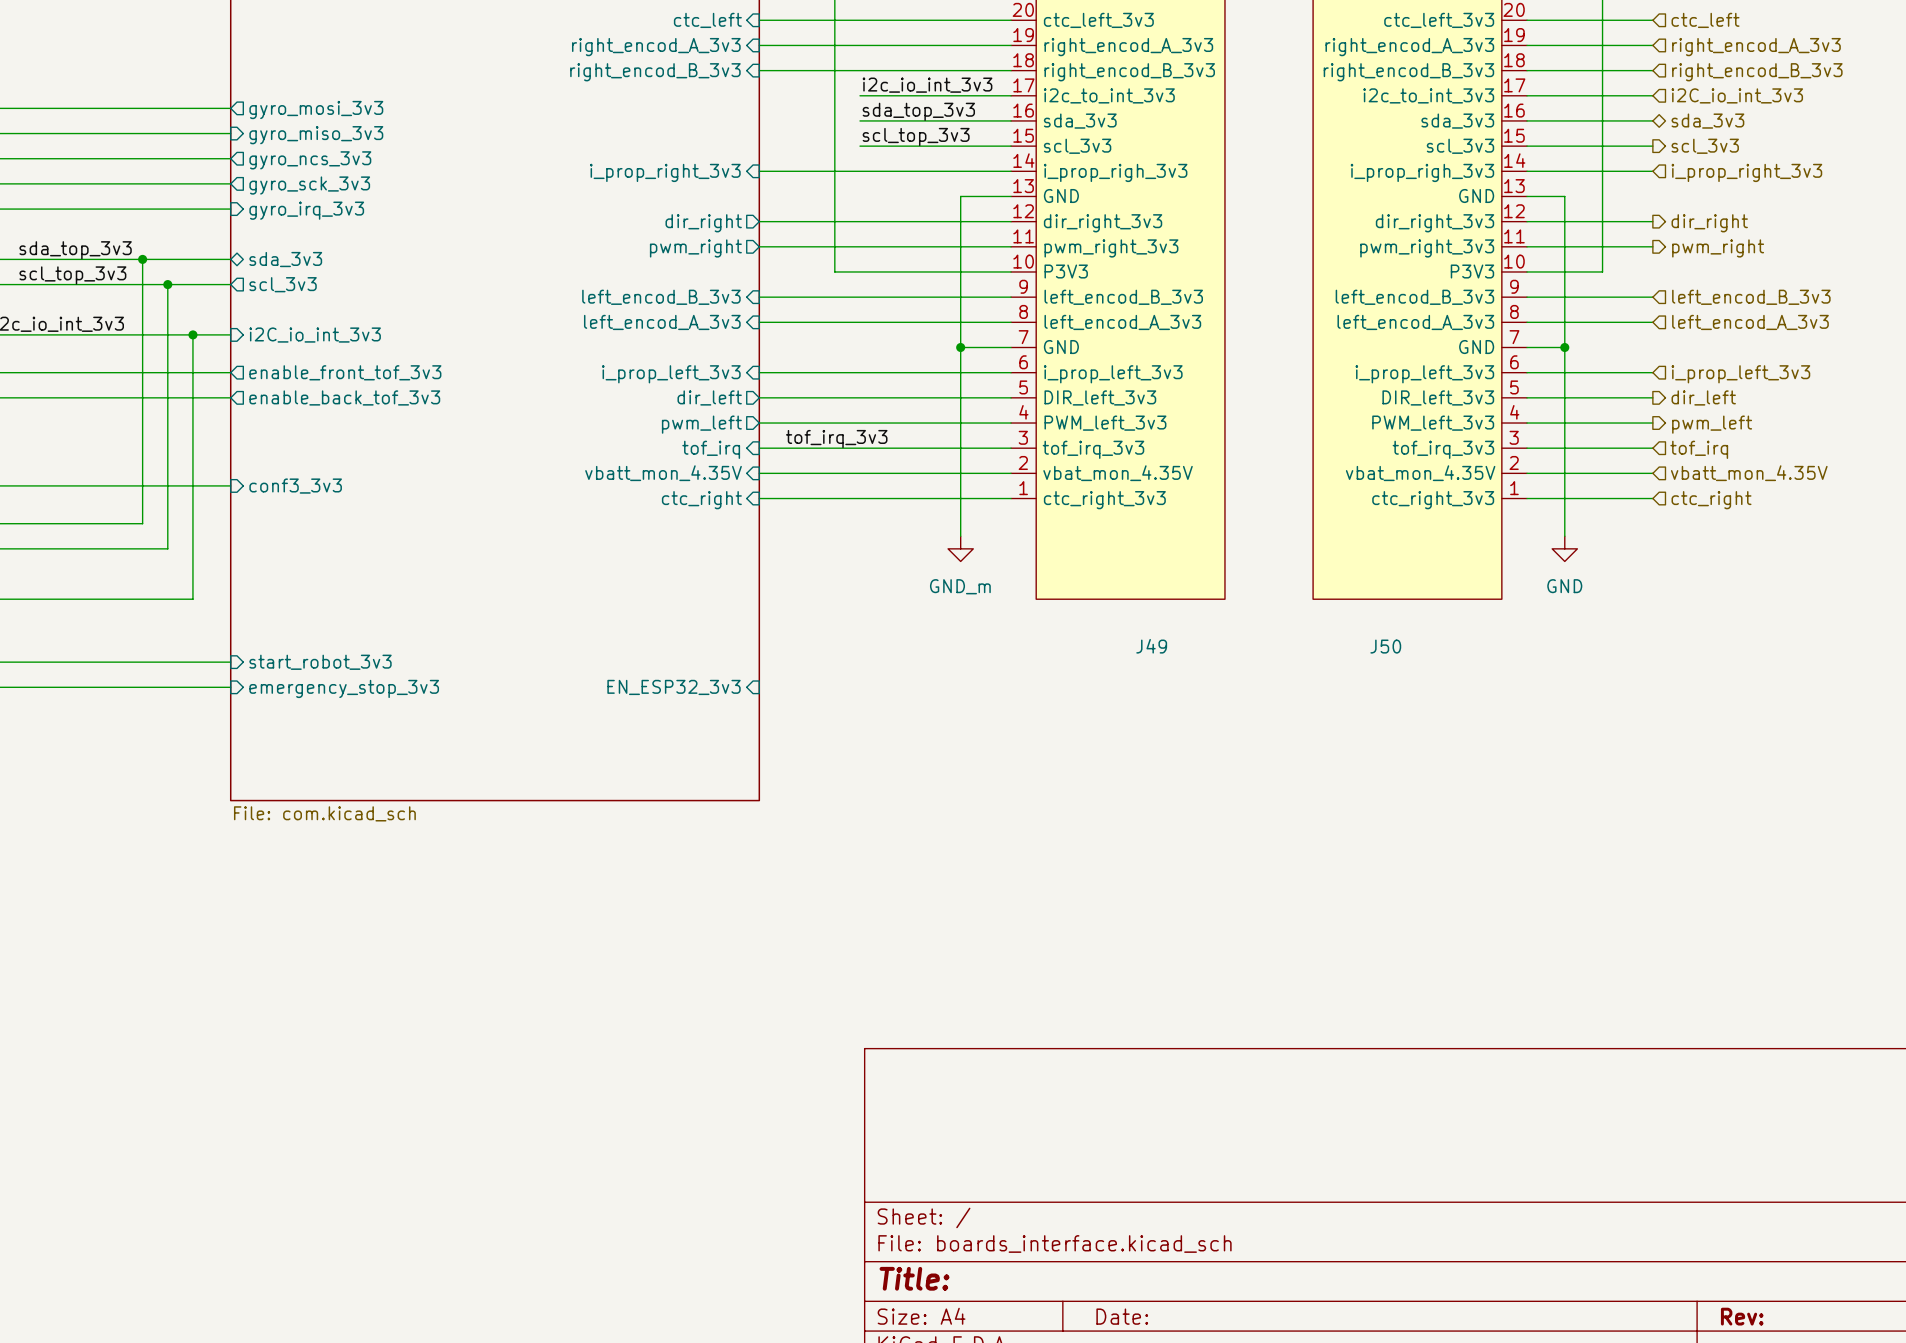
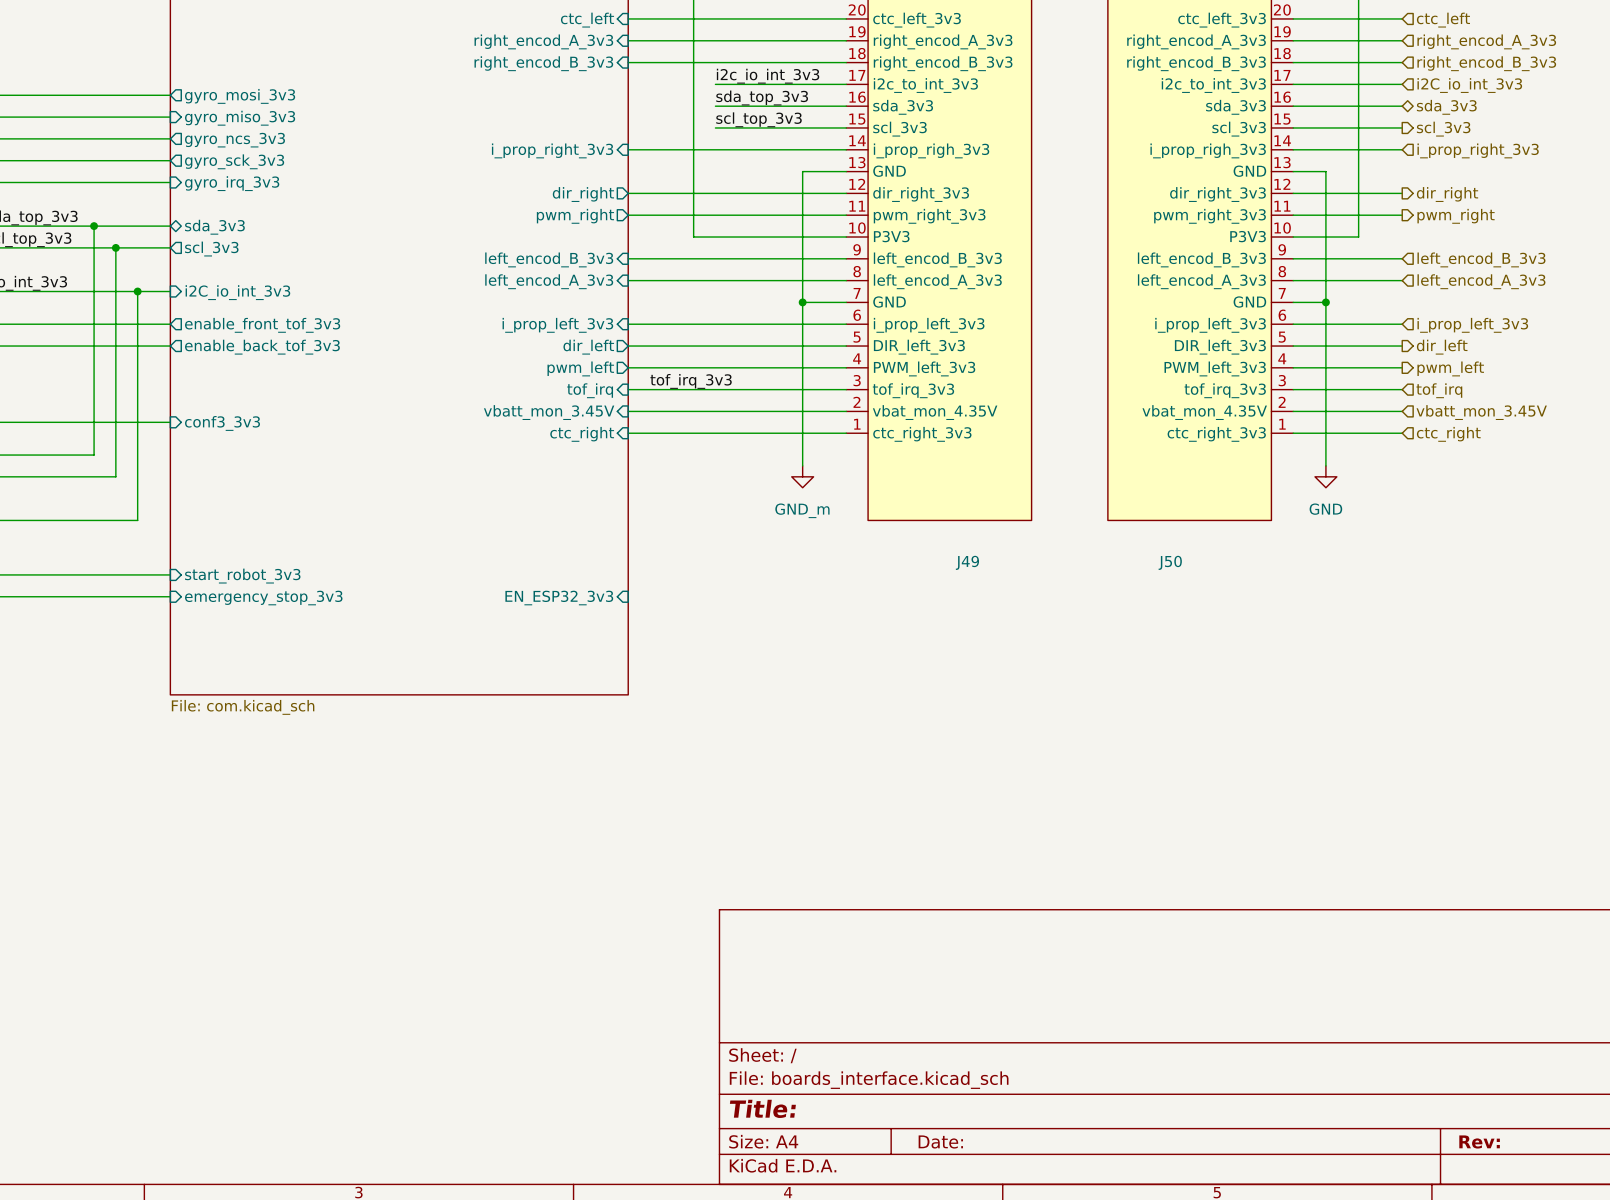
sheet pin: vbatt_mon_4.35V (663, 473) -> vbatt_mon_3.45V (549, 412)
hierarchical label: vbatt_mon_4.35V (1749, 473) -> vbatt_mon_3.45V (1481, 412)

